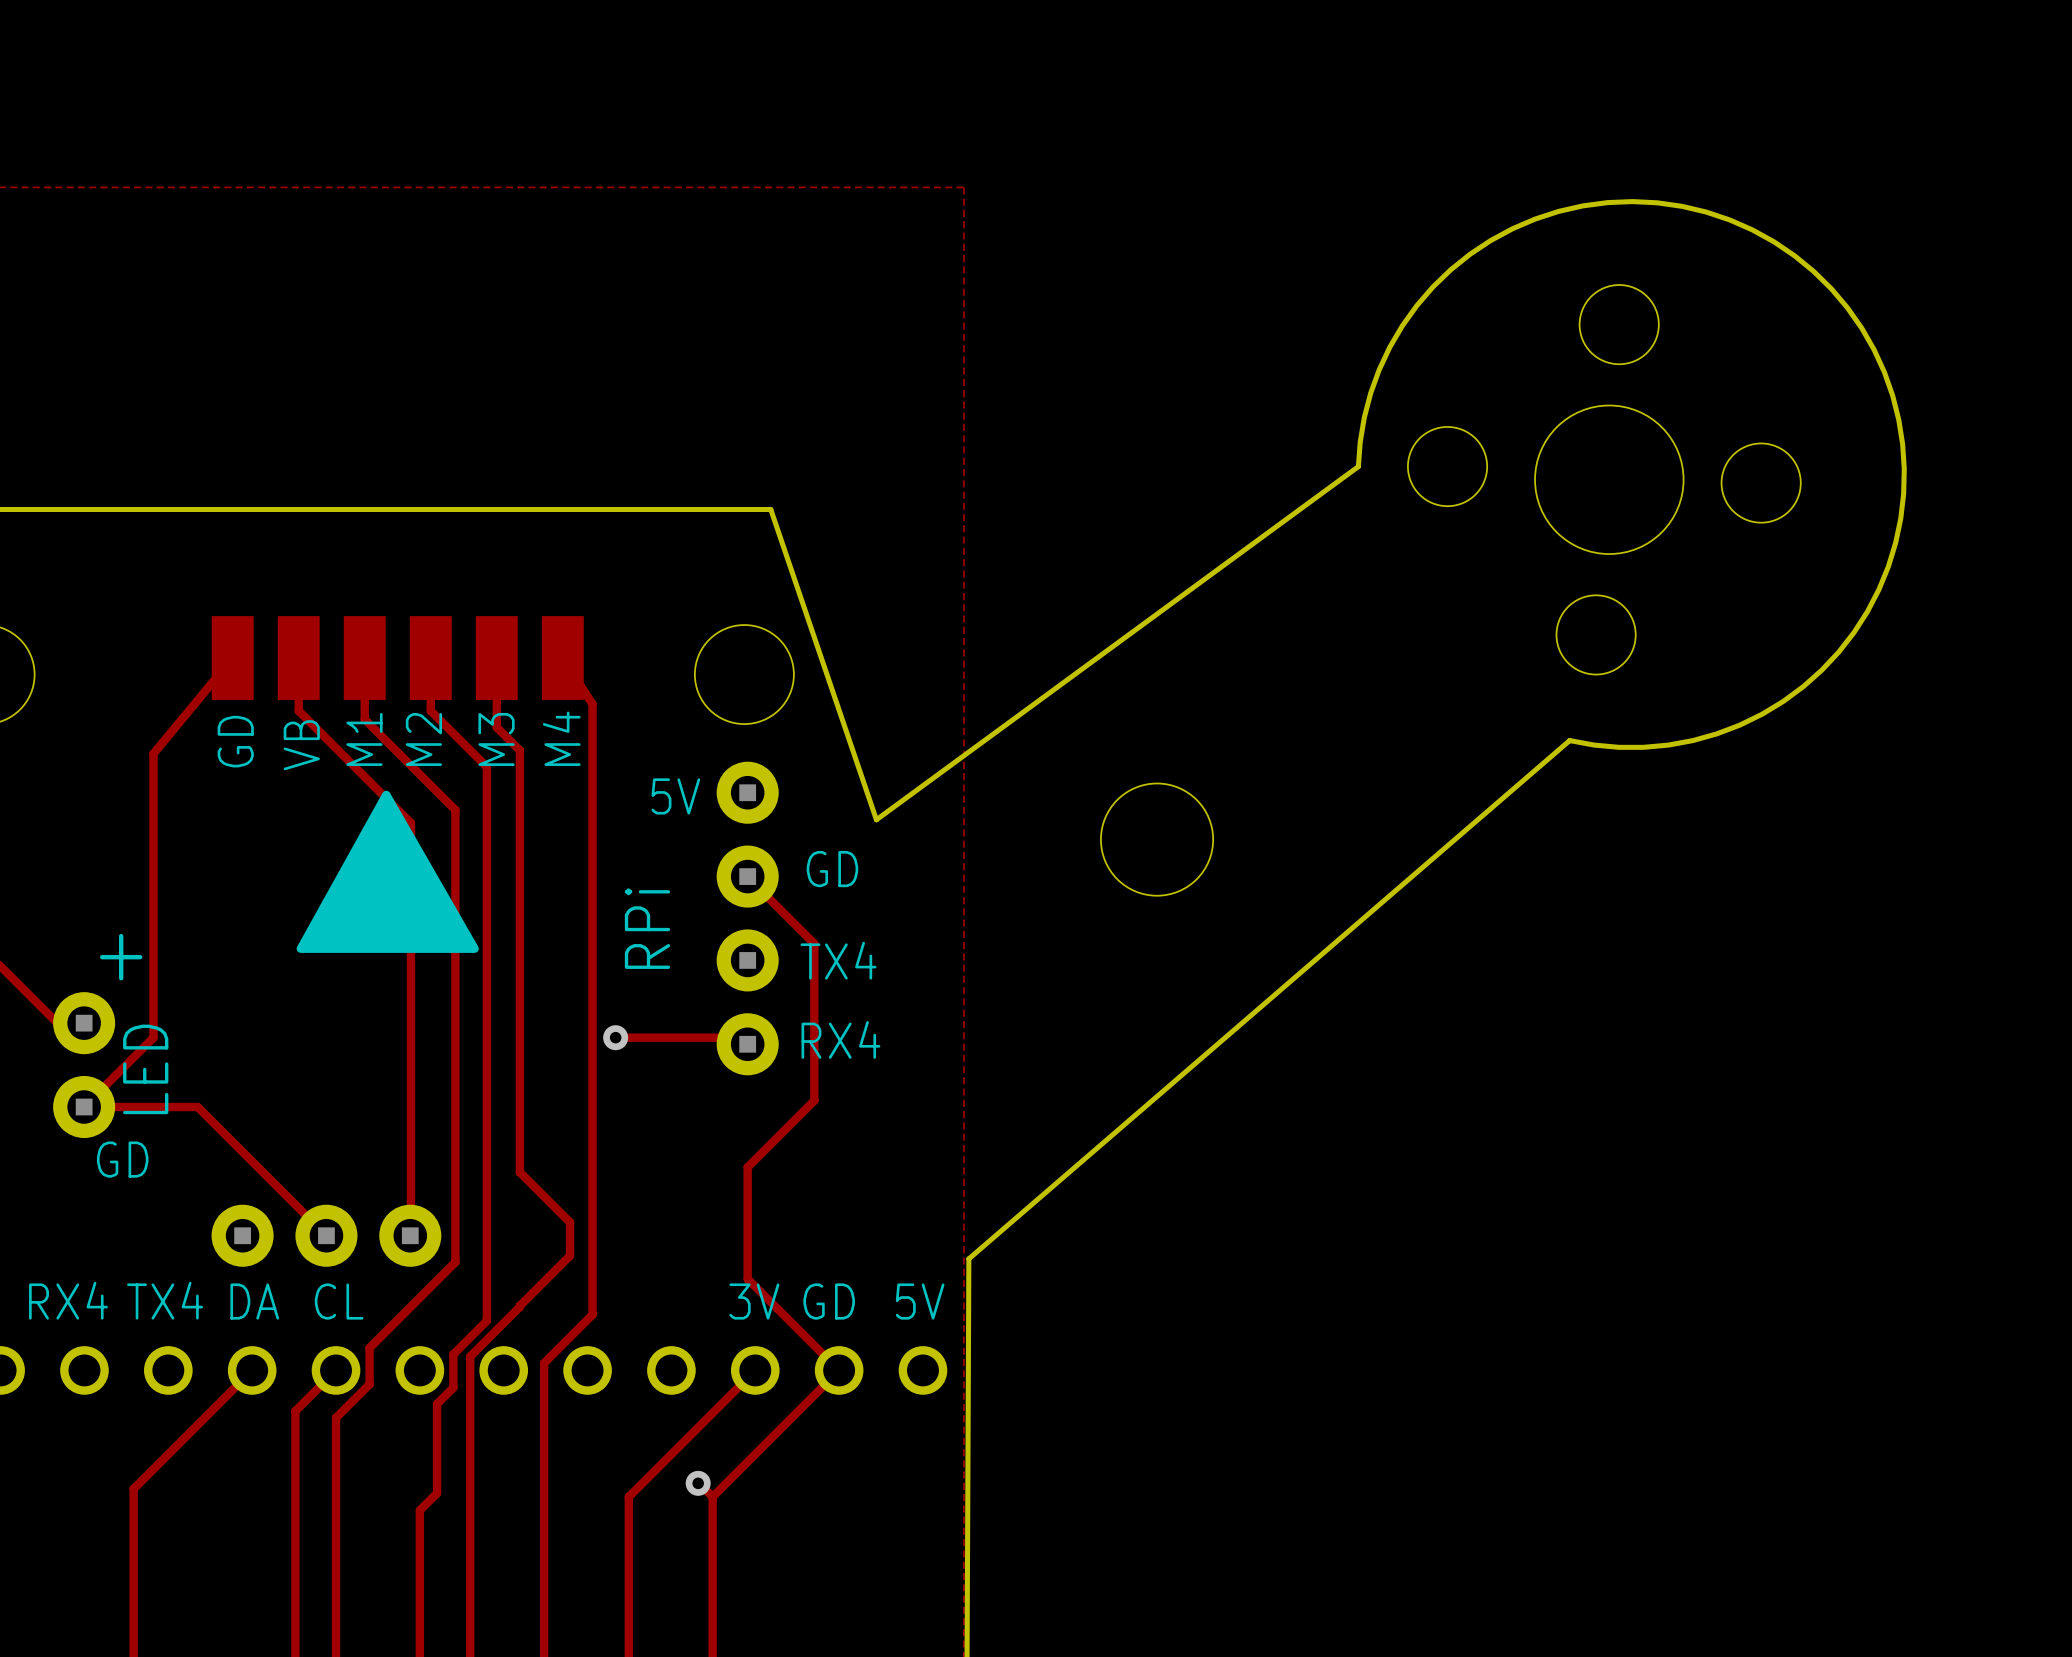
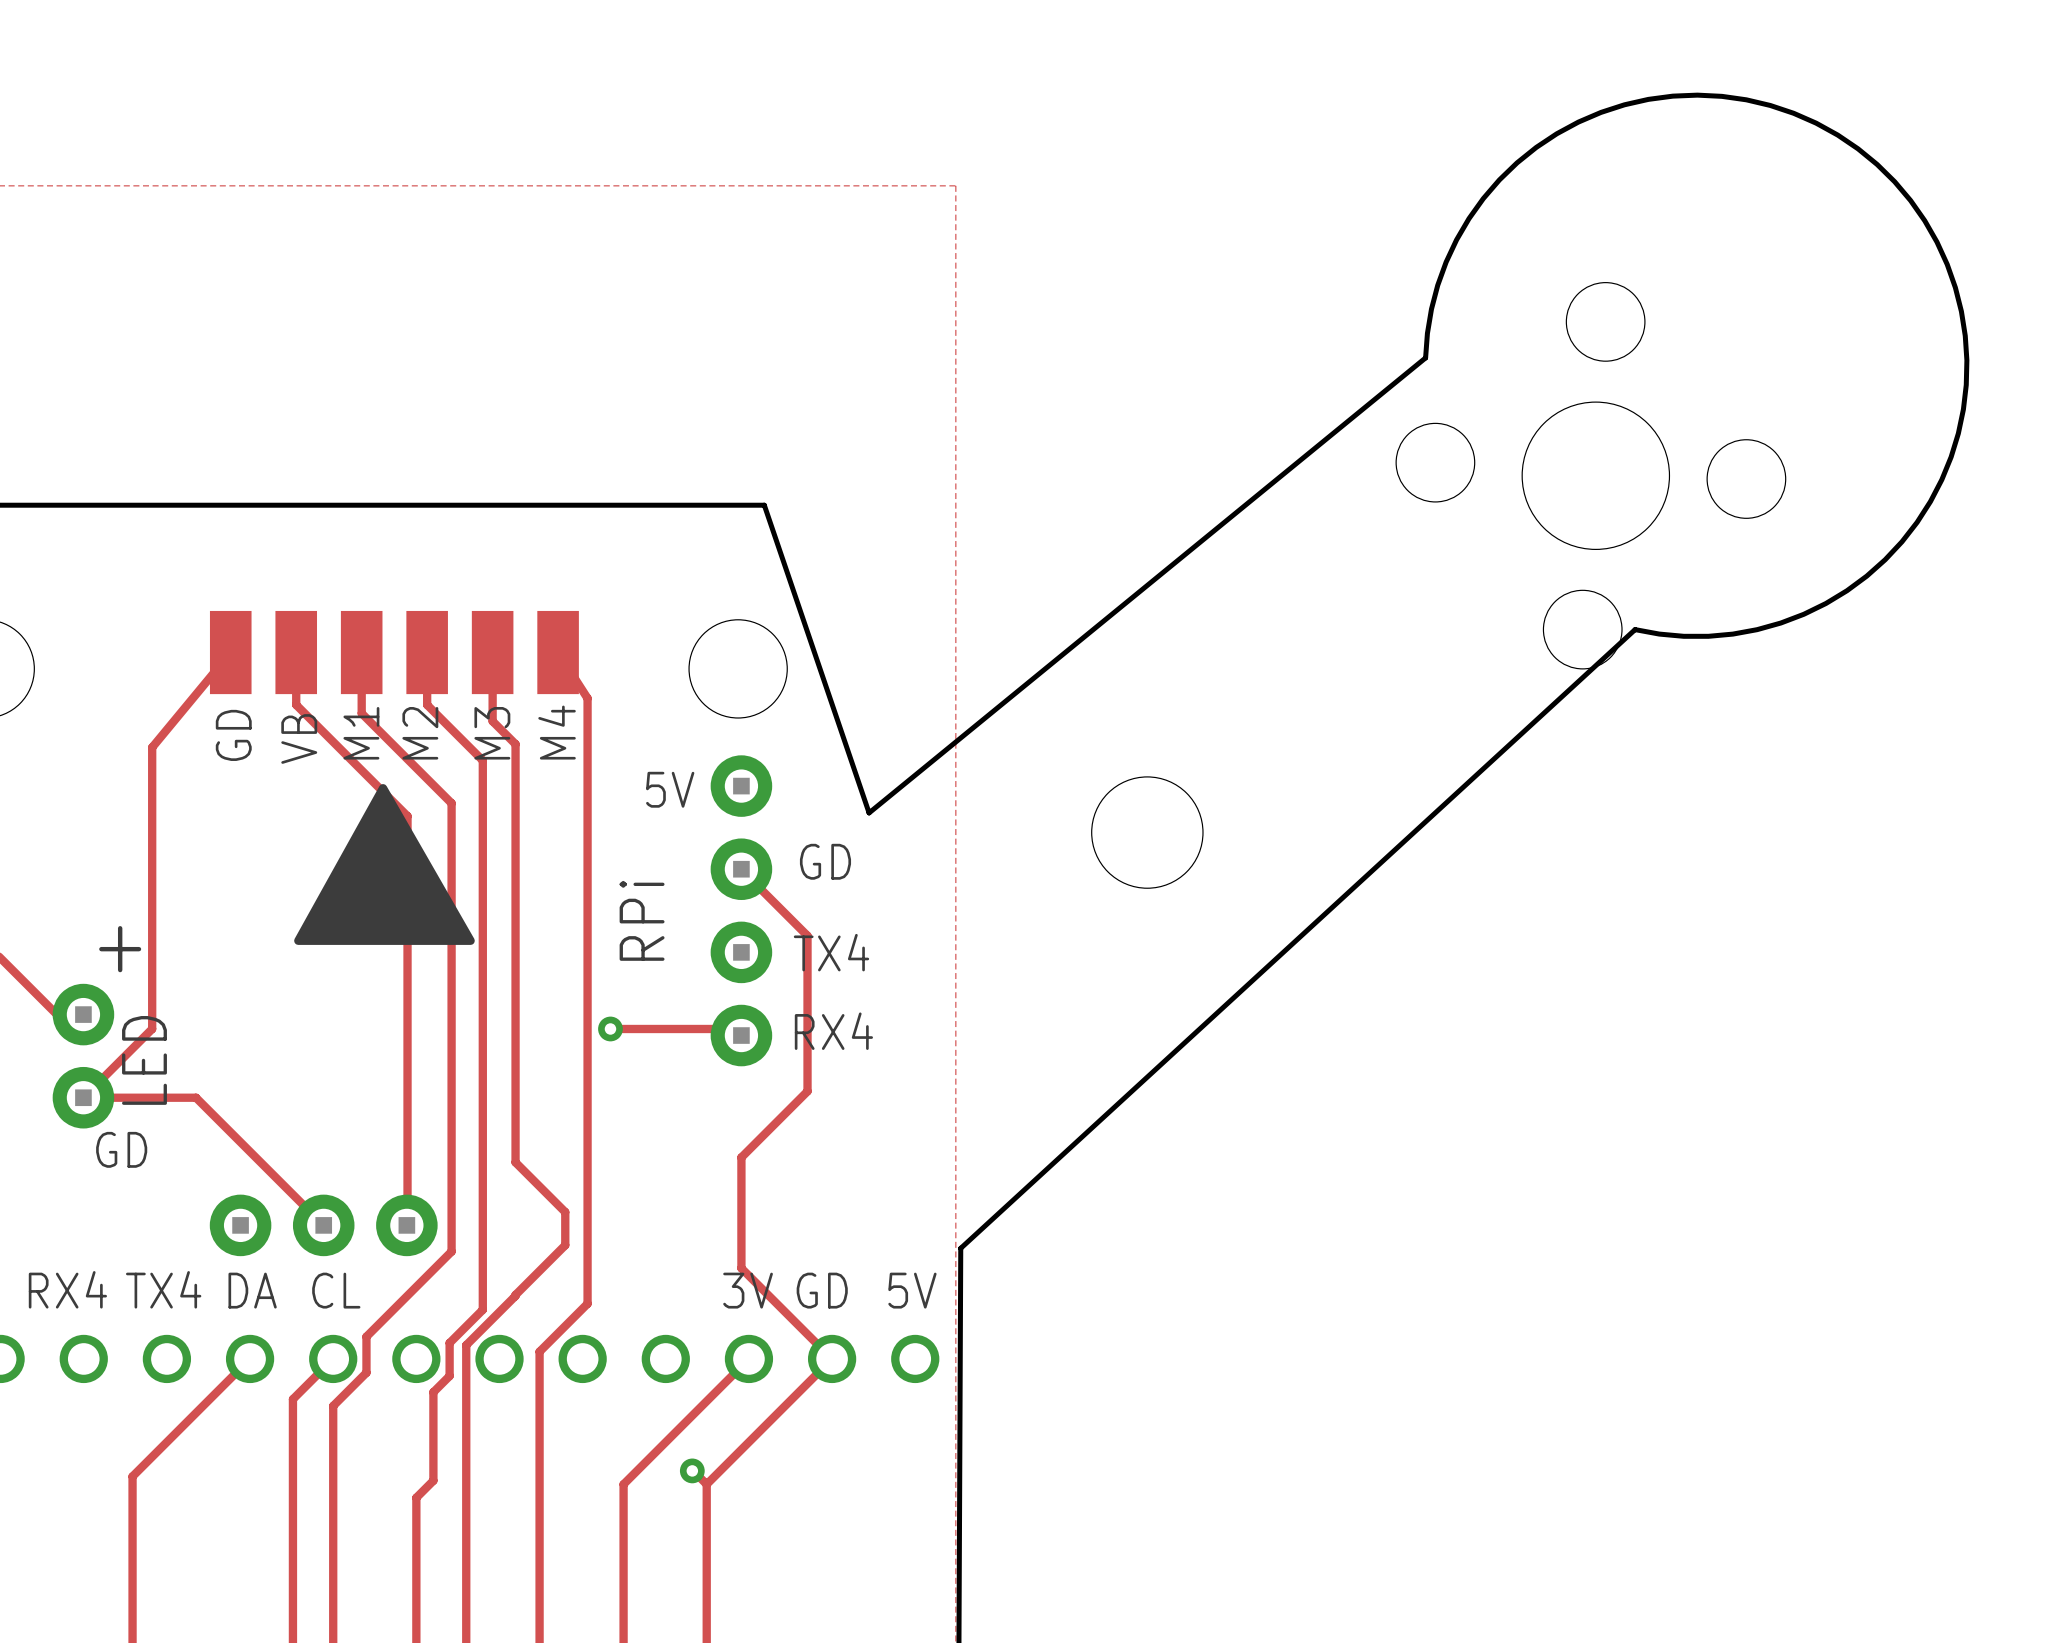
board edge: (876, 819) (1358, 466) (1360, 441) (1370, 393) (1389, 347) (1402, 326) (1432, 287) (1450, 269) (1470, 254) (1512, 228) (1558, 211) (1583, 205) (1632, 201) (1681, 206) (1729, 219) (1774, 241) (1813, 271) (1831, 288) (1861, 328) (1884, 372) (1898, 419) (1902, 444) (1903, 493) (1900, 518) (1888, 566) (1878, 589) (1854, 632) (1821, 670) (1803, 686) (1762, 714) (1739, 725) (1692, 740) (1668, 745) (1618, 747) (1569, 740) (968, 1258) -> (869, 812) (1425, 357) (1427, 333) (1437, 285) (1456, 239) (1469, 218) (1499, 179) (1517, 162) (1536, 147) (1578, 122) (1624, 104) (1672, 96) (1722, 96) (1770, 105) (1816, 123) (1837, 135) (1877, 164) (1910, 200) (1936, 242) (1947, 264) (1961, 311) (1966, 360) (1963, 409) (1951, 457) (1941, 479) (1917, 522) (1885, 559) (1866, 576) (1825, 603) (1803, 614) (1757, 629) (1732, 634) (1683, 636) (1635, 629) (960, 1248)

